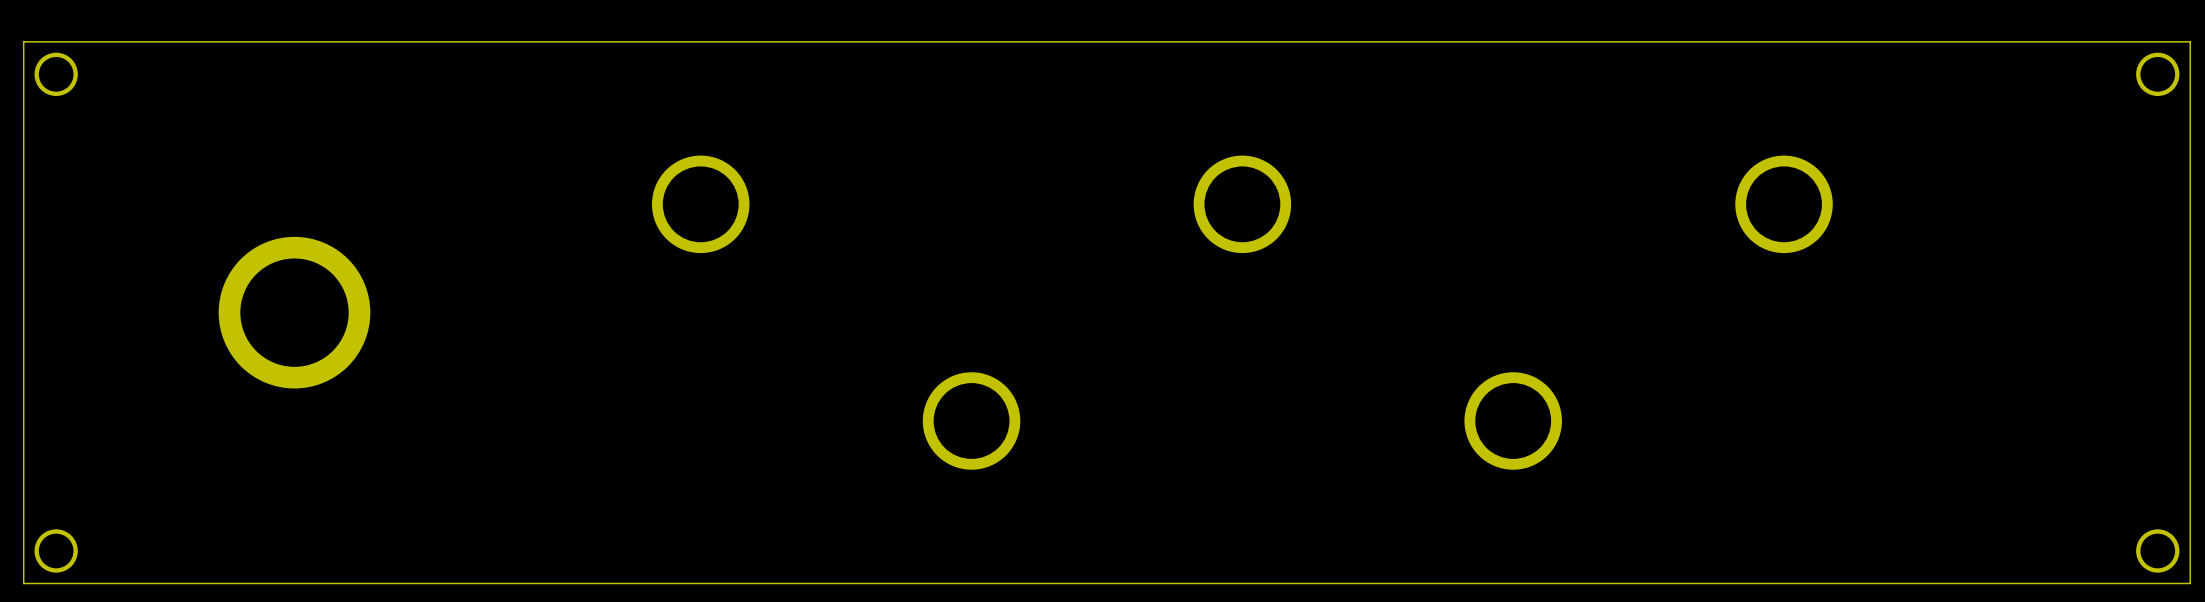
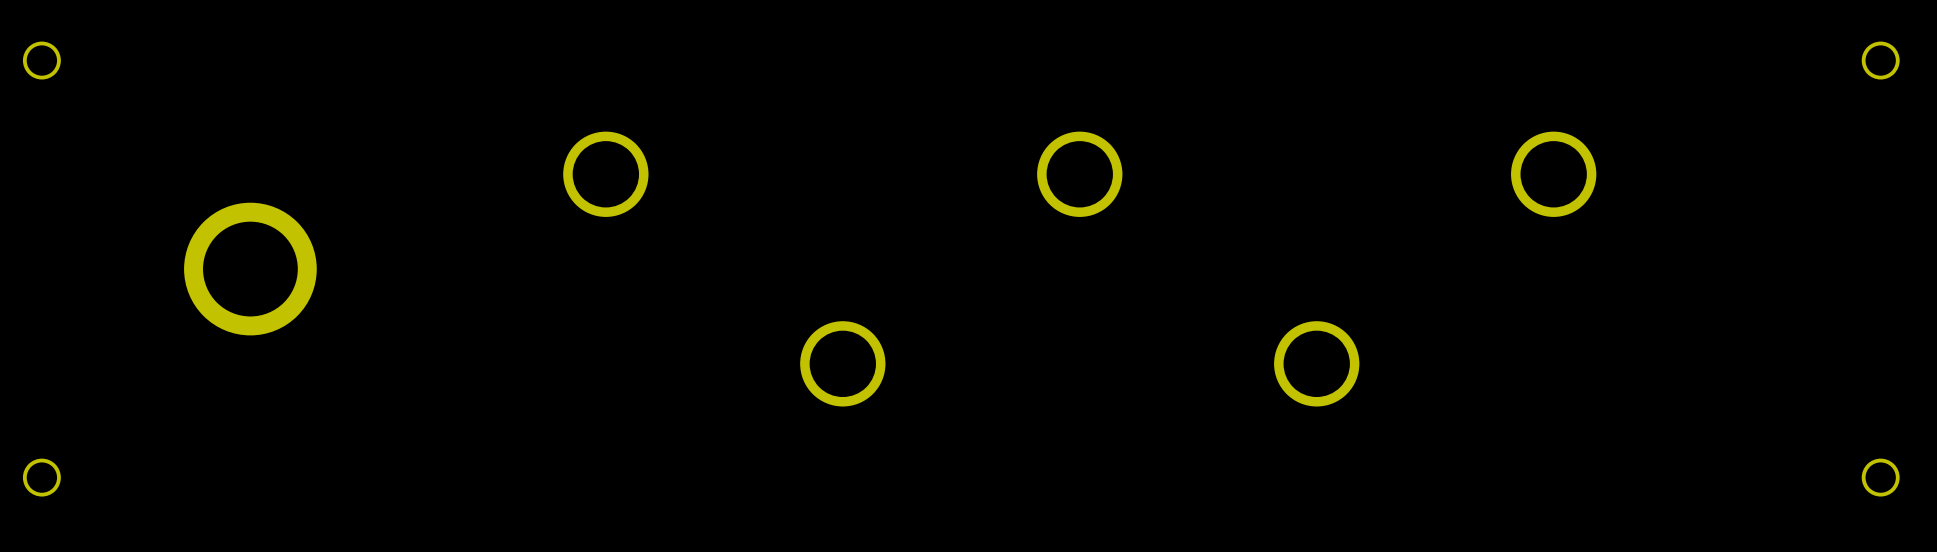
board edge: (2190, 41) (23, 41) (23, 583) (2190, 583) (2190, 41) -> none

